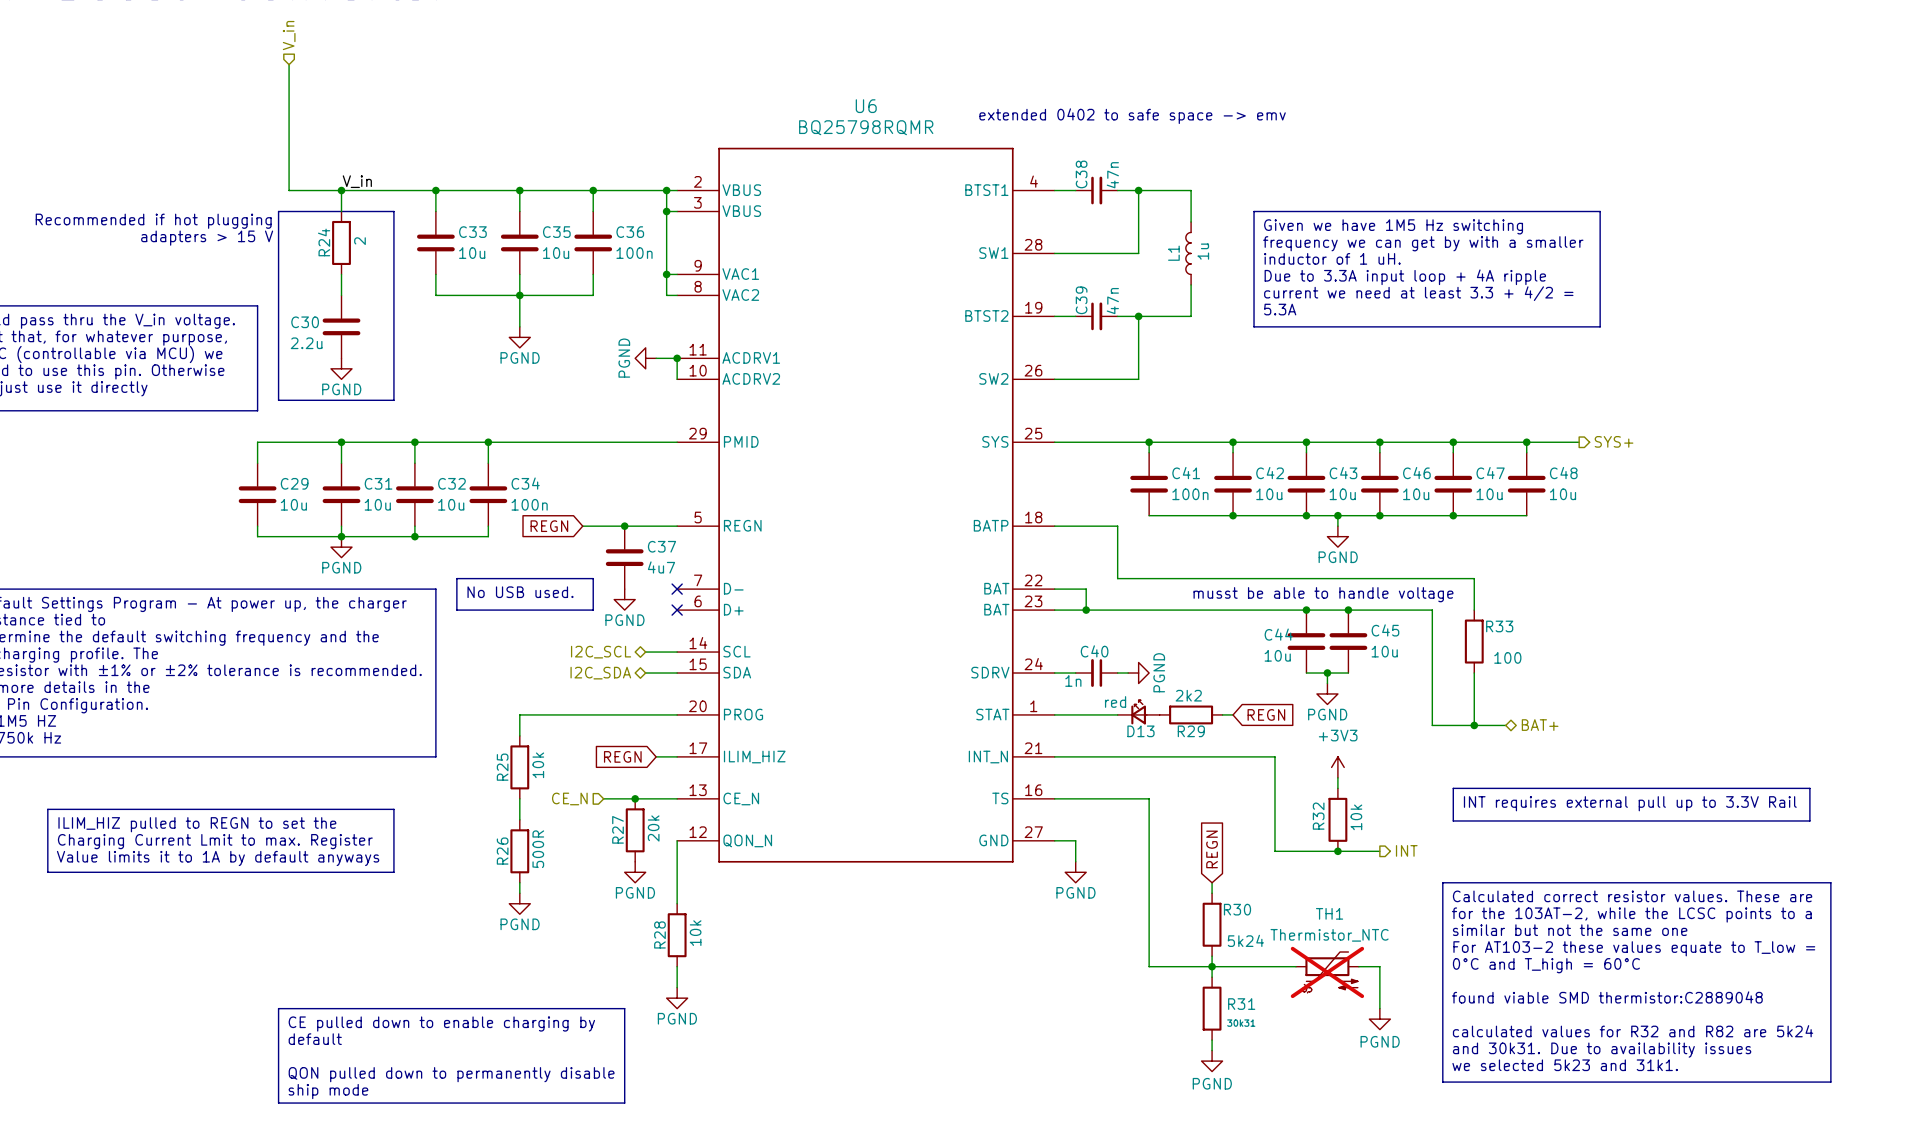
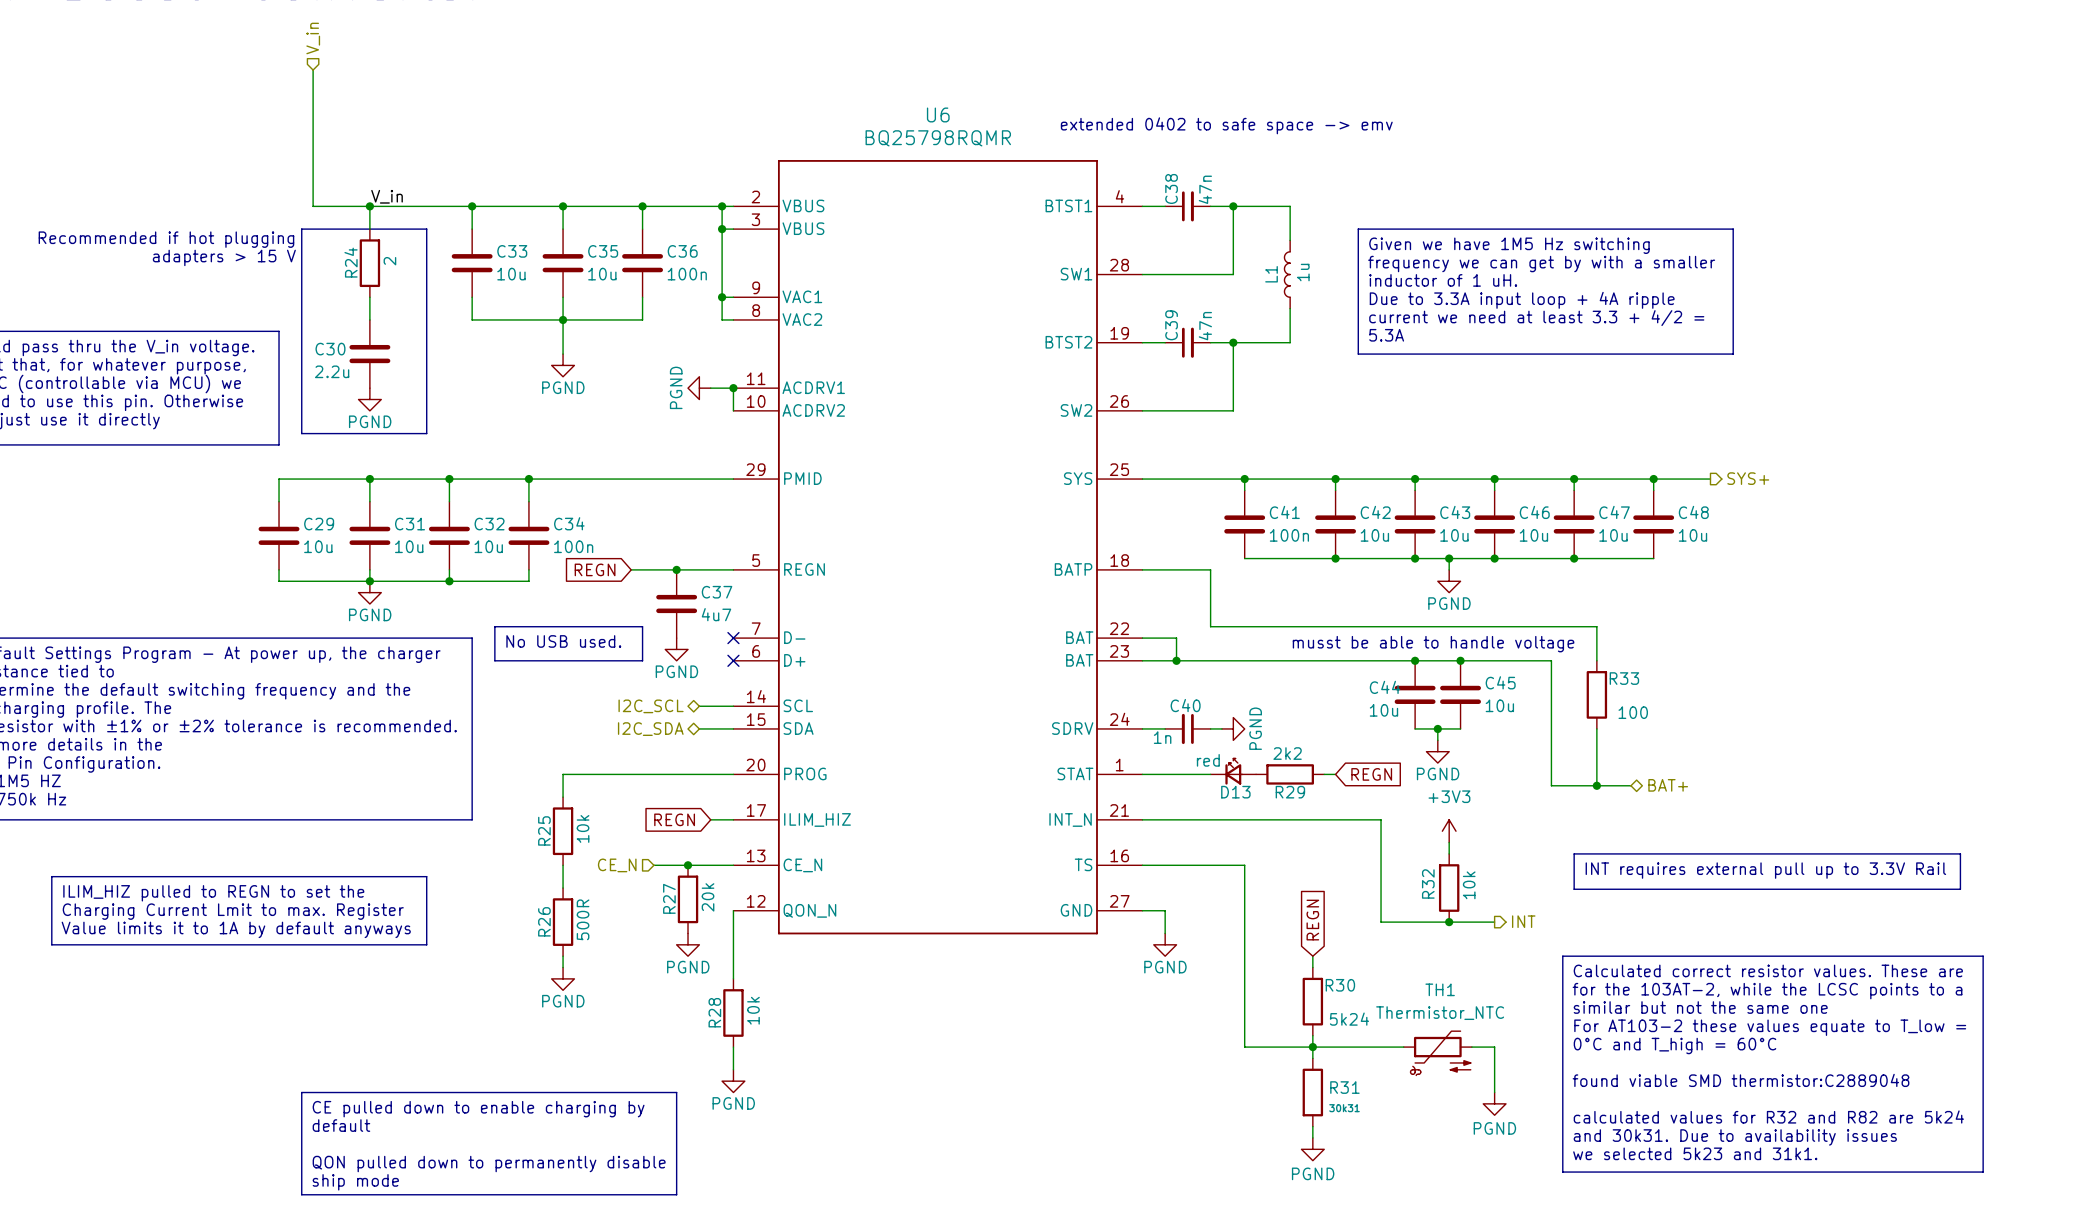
TH1 do-not-place cross: (1327, 972) -> none

